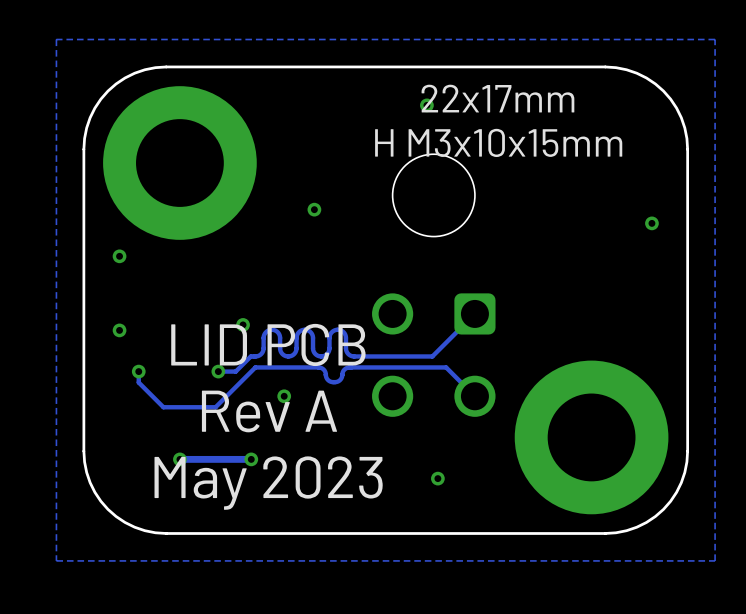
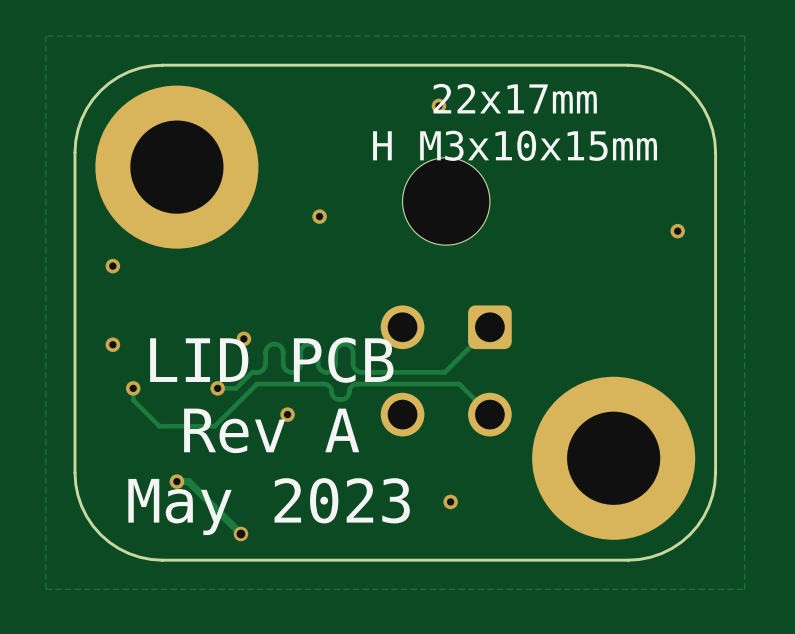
track: (251, 459) (190, 459) -> (240, 533) (188, 481)
via: (251, 459) -> none
via: none -> (240, 533)

